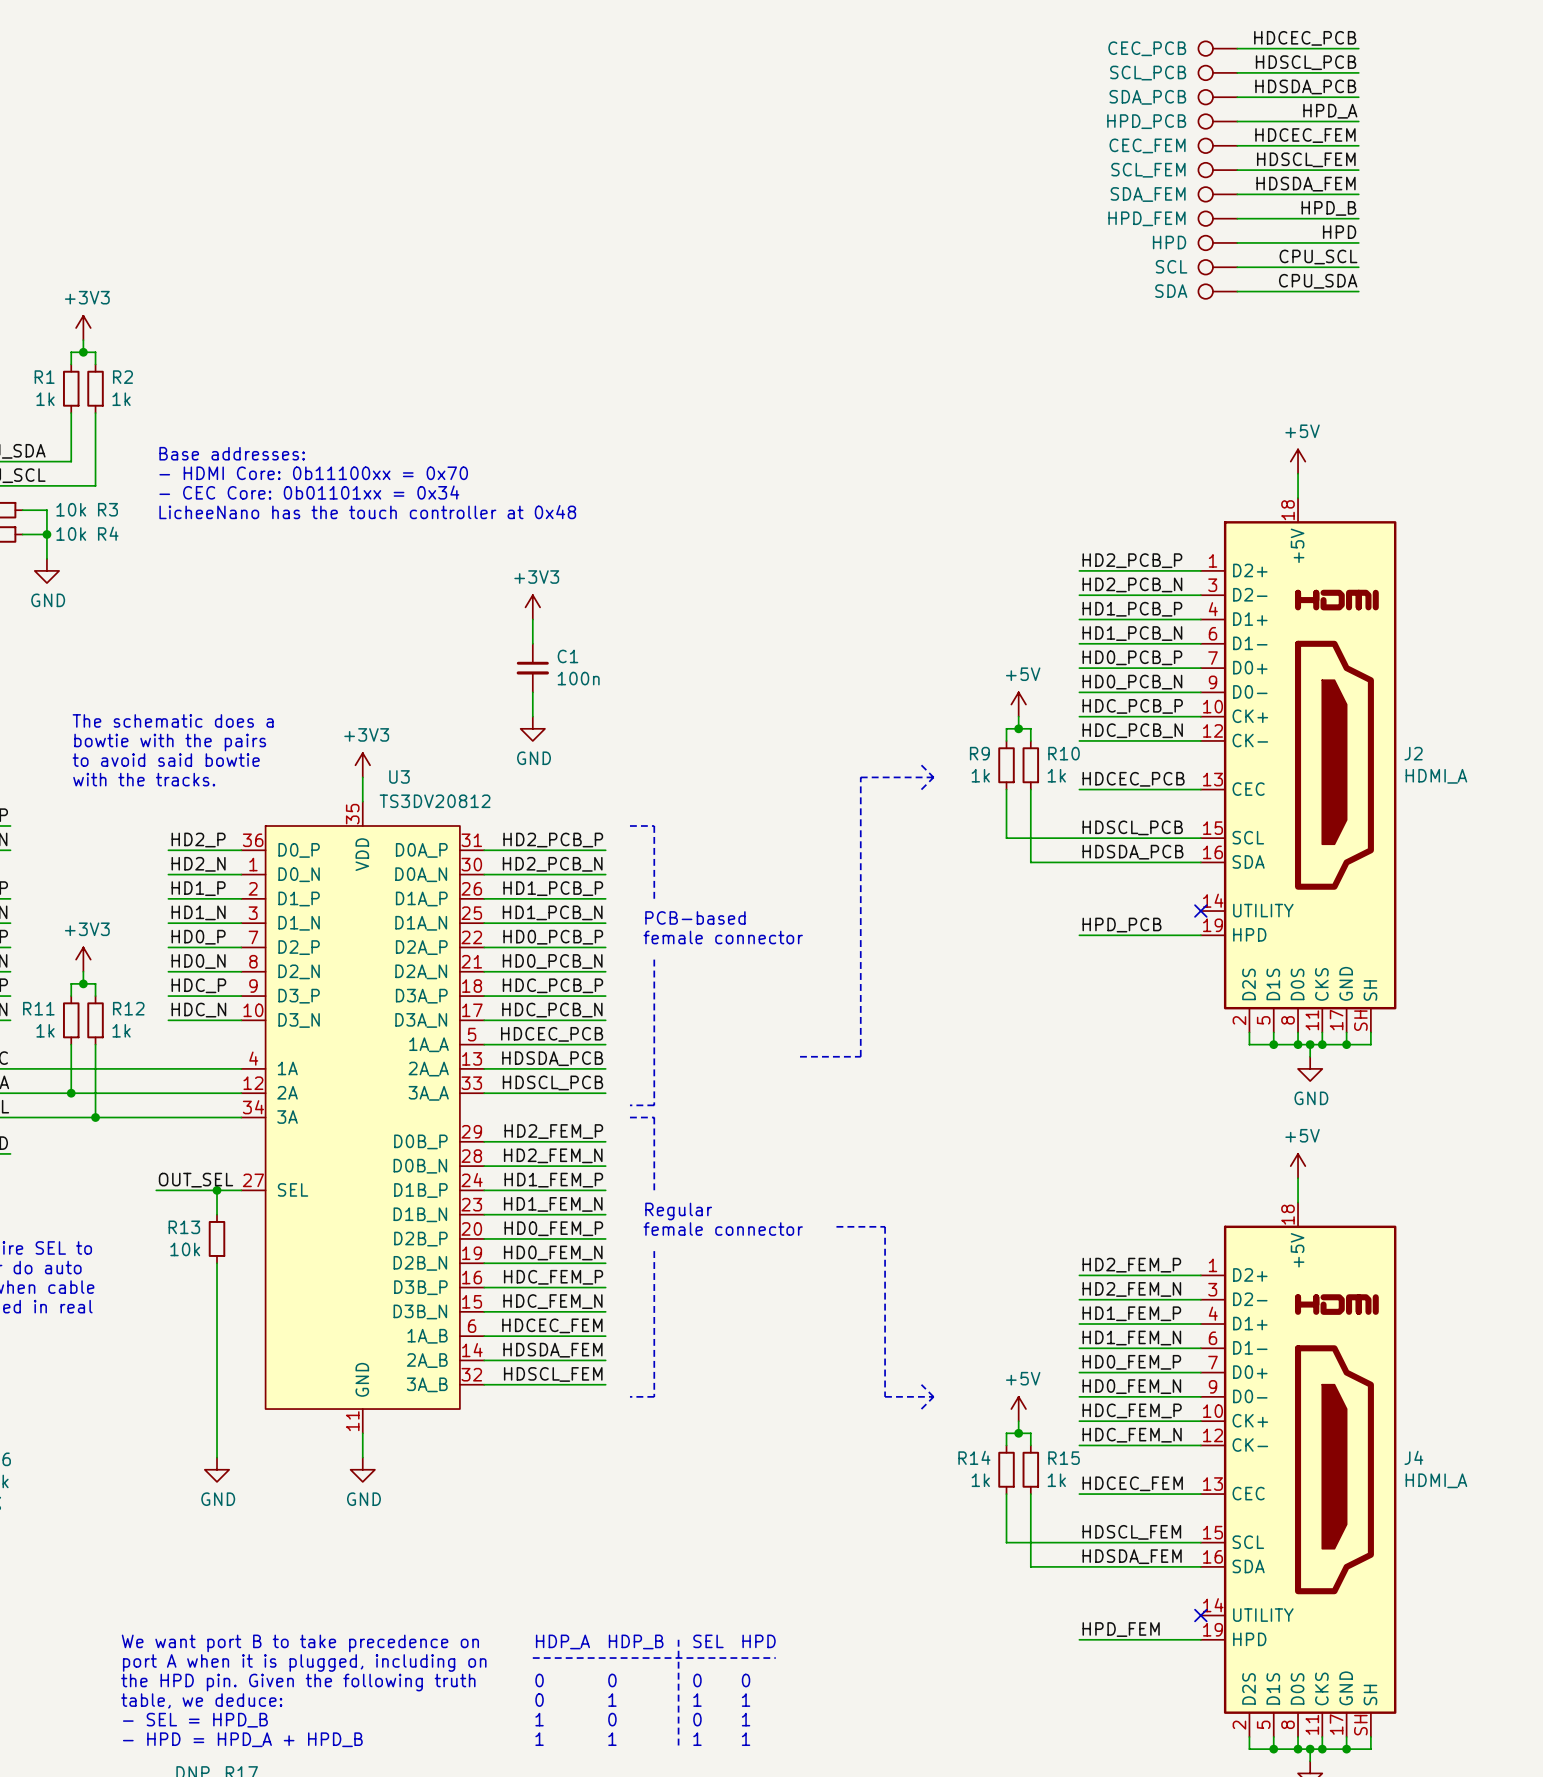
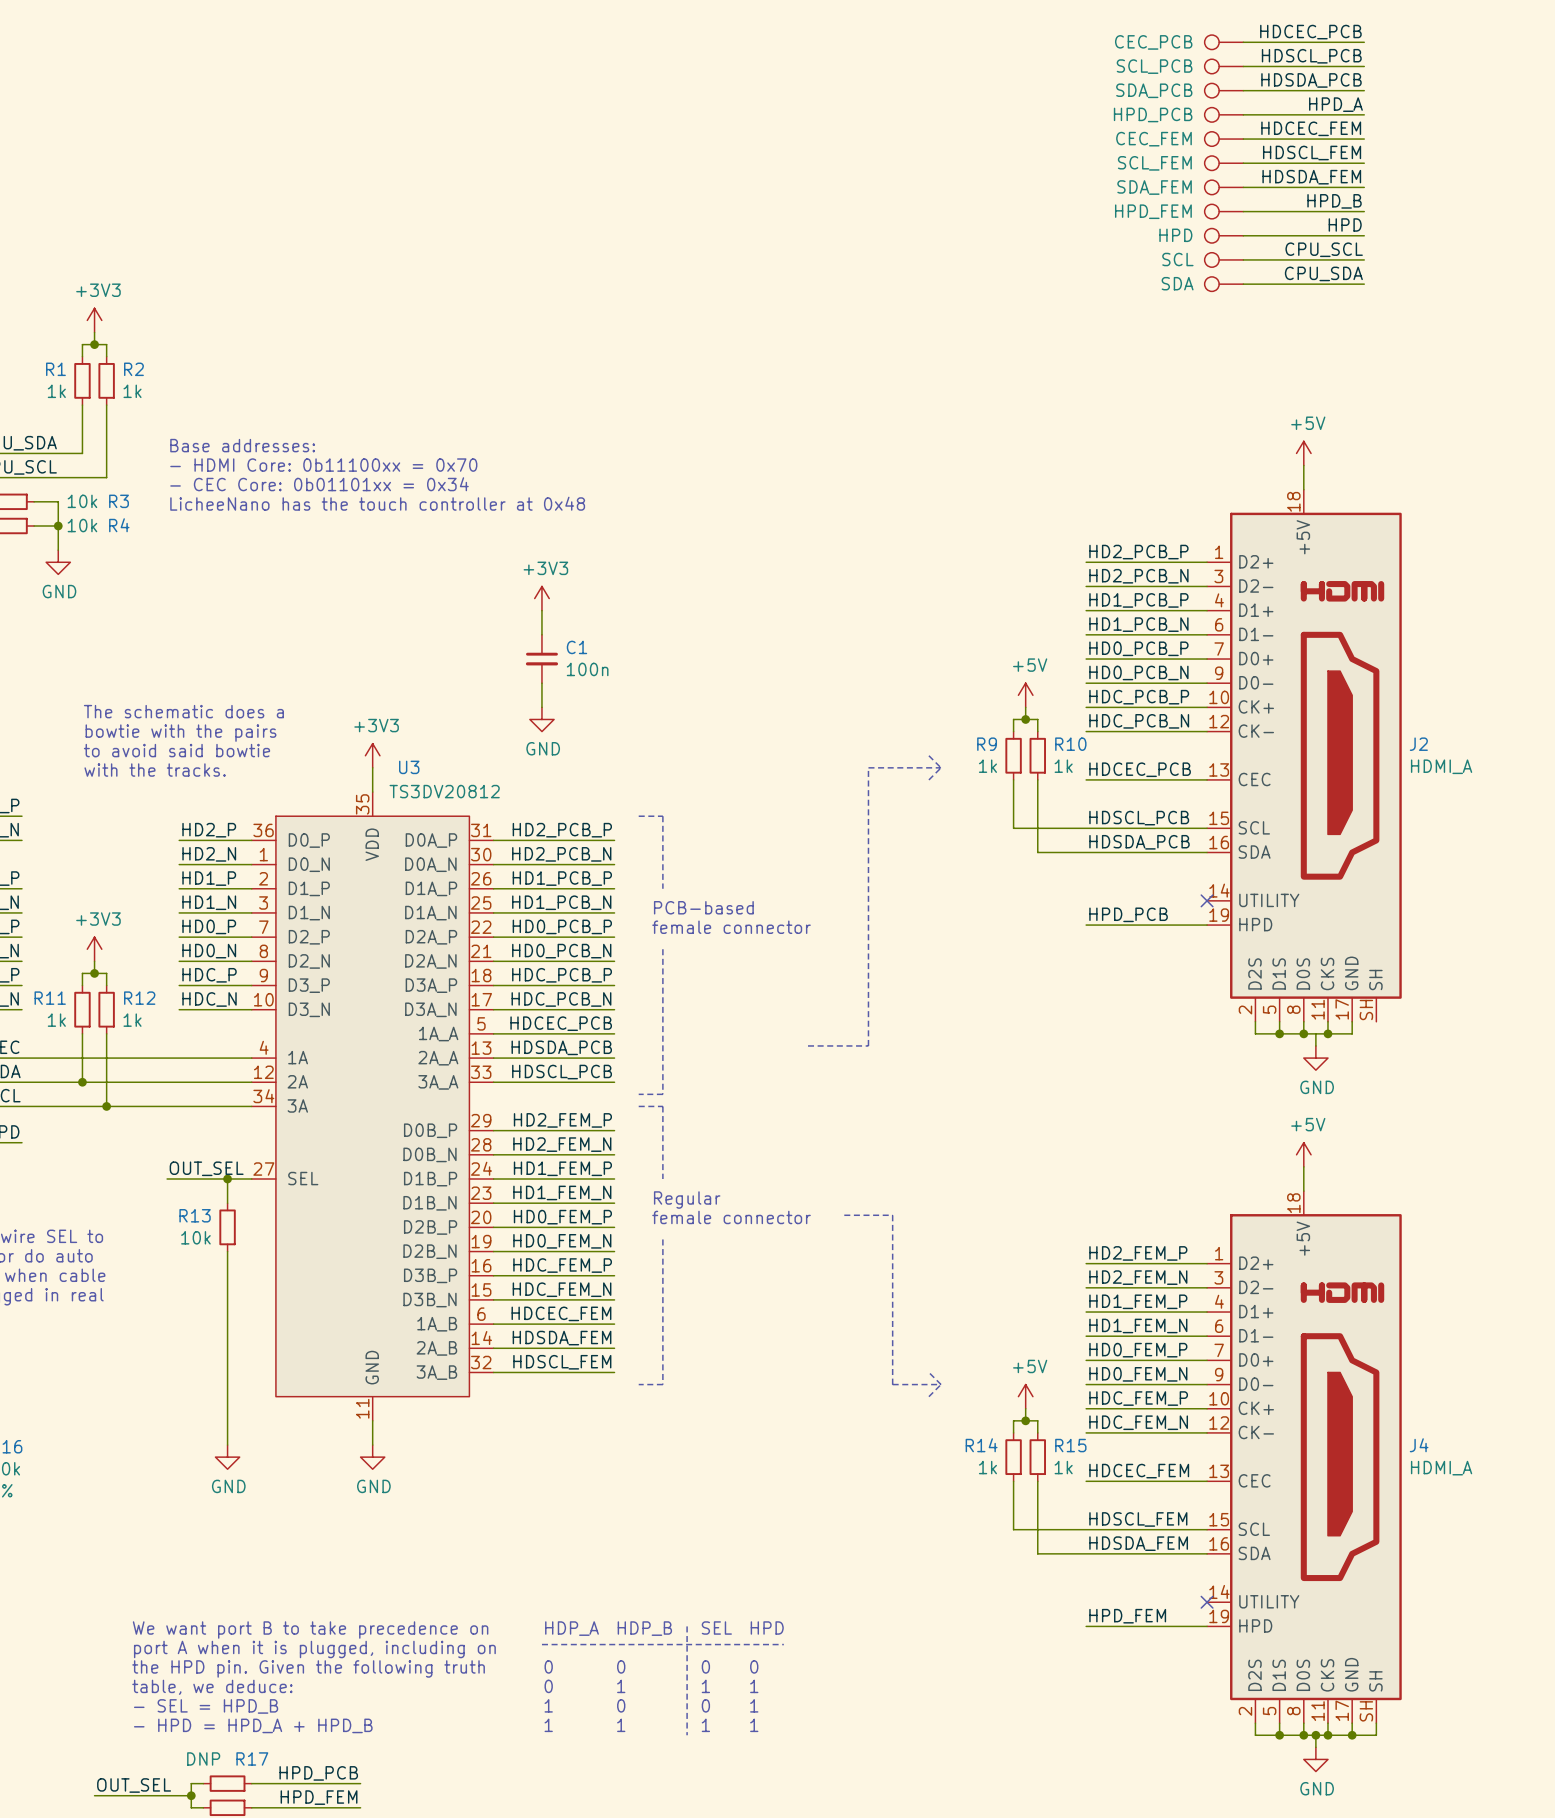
wire: (1370, 1032) (1370, 1044) (1346, 1044) -> none
junction: (1310, 1044) -> none
junction: (1346, 1044) -> none

